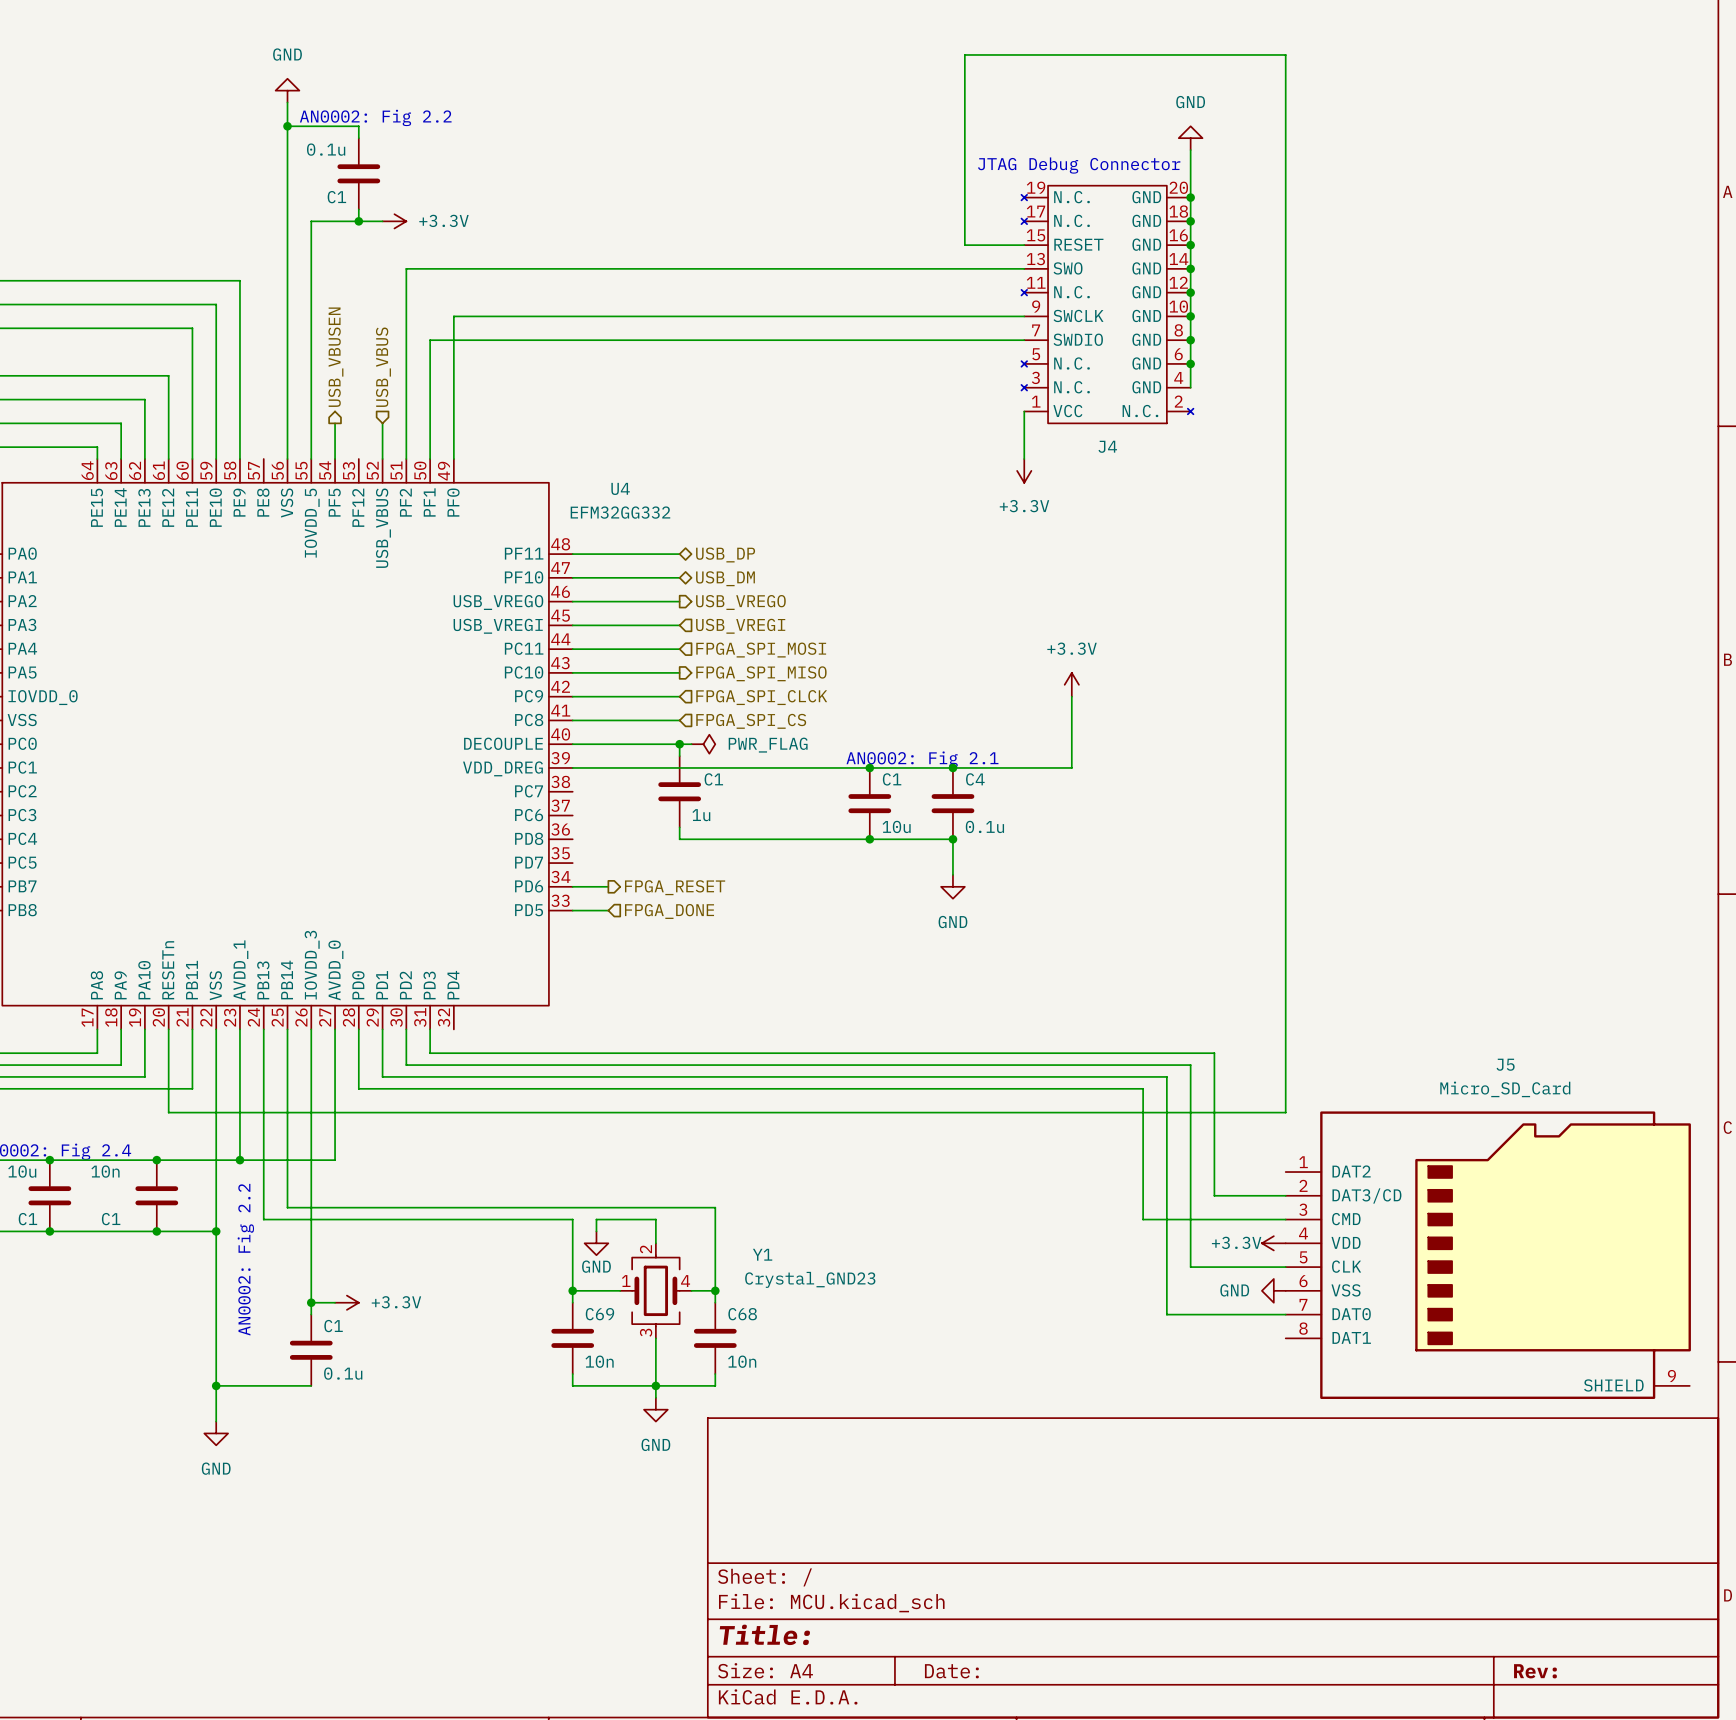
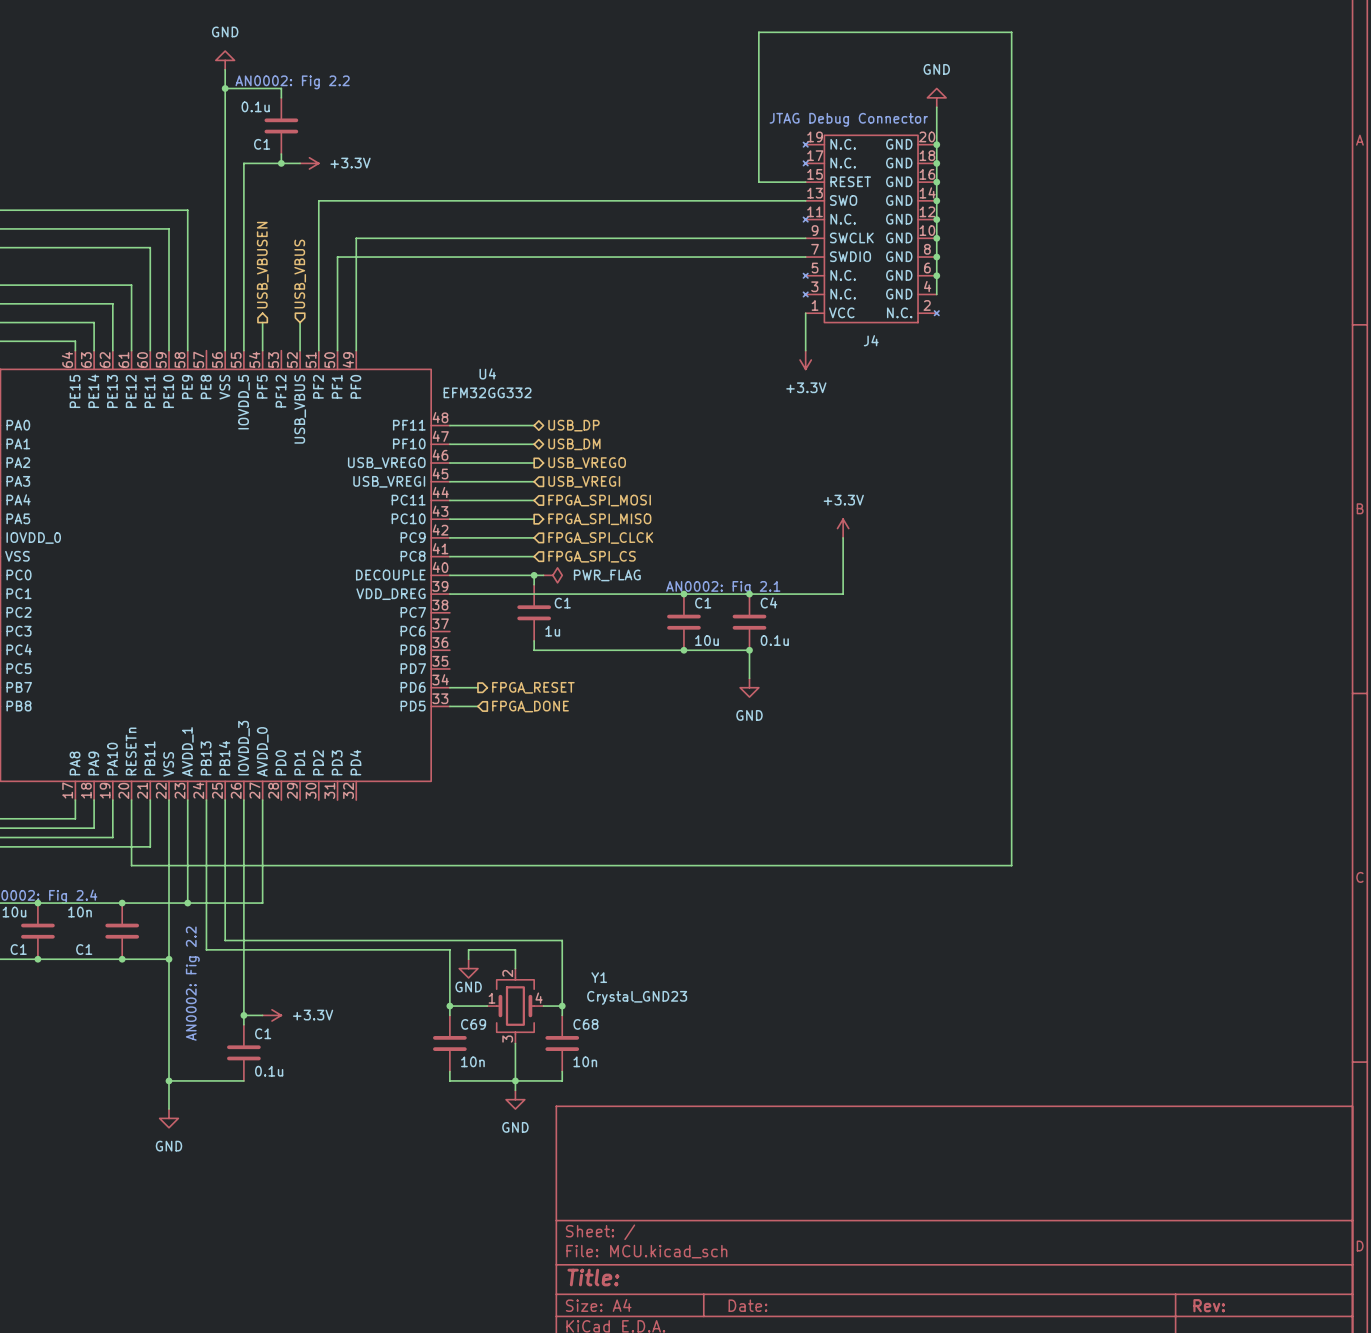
wire: (358, 1029) (358, 1088) (1143, 1088) (1143, 1219) (1285, 1219) -> none
wire: (382, 1029) (382, 1076) (1166, 1076) (1166, 1314) (1285, 1314) -> none
wire: (406, 1029) (406, 1065) (1190, 1065) (1190, 1267) (1285, 1267) -> none
wire: (430, 1029) (430, 1053) (1214, 1053) (1214, 1195) (1285, 1195) -> none
power symbol: +3.3V (1273, 1243) -> none
J5: Micro_SD_Card (1488, 1255) -> none
power symbol: GND (1273, 1290) -> none

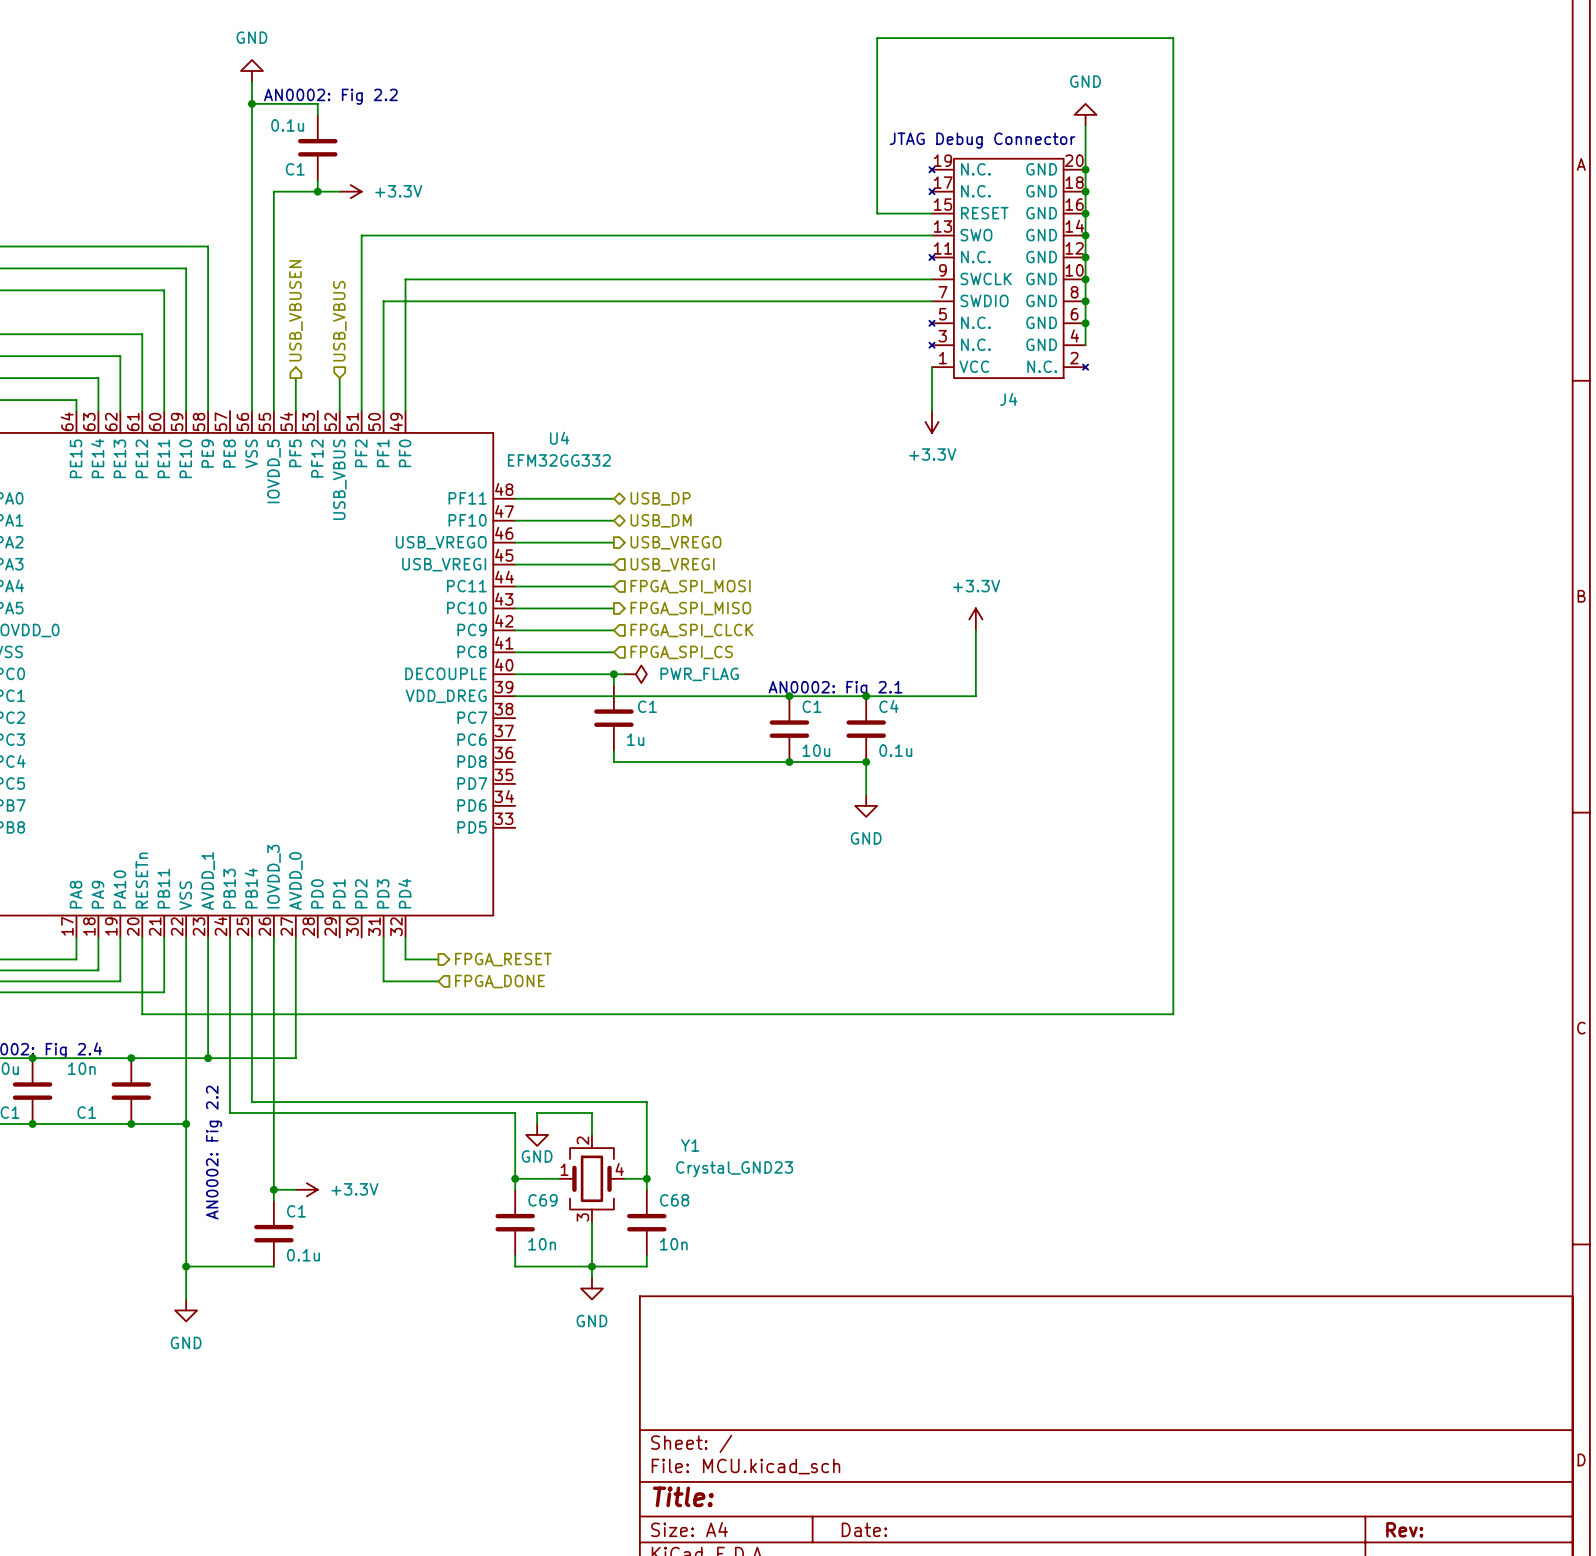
wire: (449, 687) (477, 687) -> none
hierarchical label position: FPGA_RESET (533, 687) -> FPGA_RESET (503, 959)
wire: (449, 706) (477, 706) -> none
hierarchical label position: FPGA_DONE (530, 706) -> FPGA_DONE (499, 981)
wire: none -> (383, 937) (383, 981) (438, 981)
wire: none -> (405, 937) (405, 959) (438, 959)

